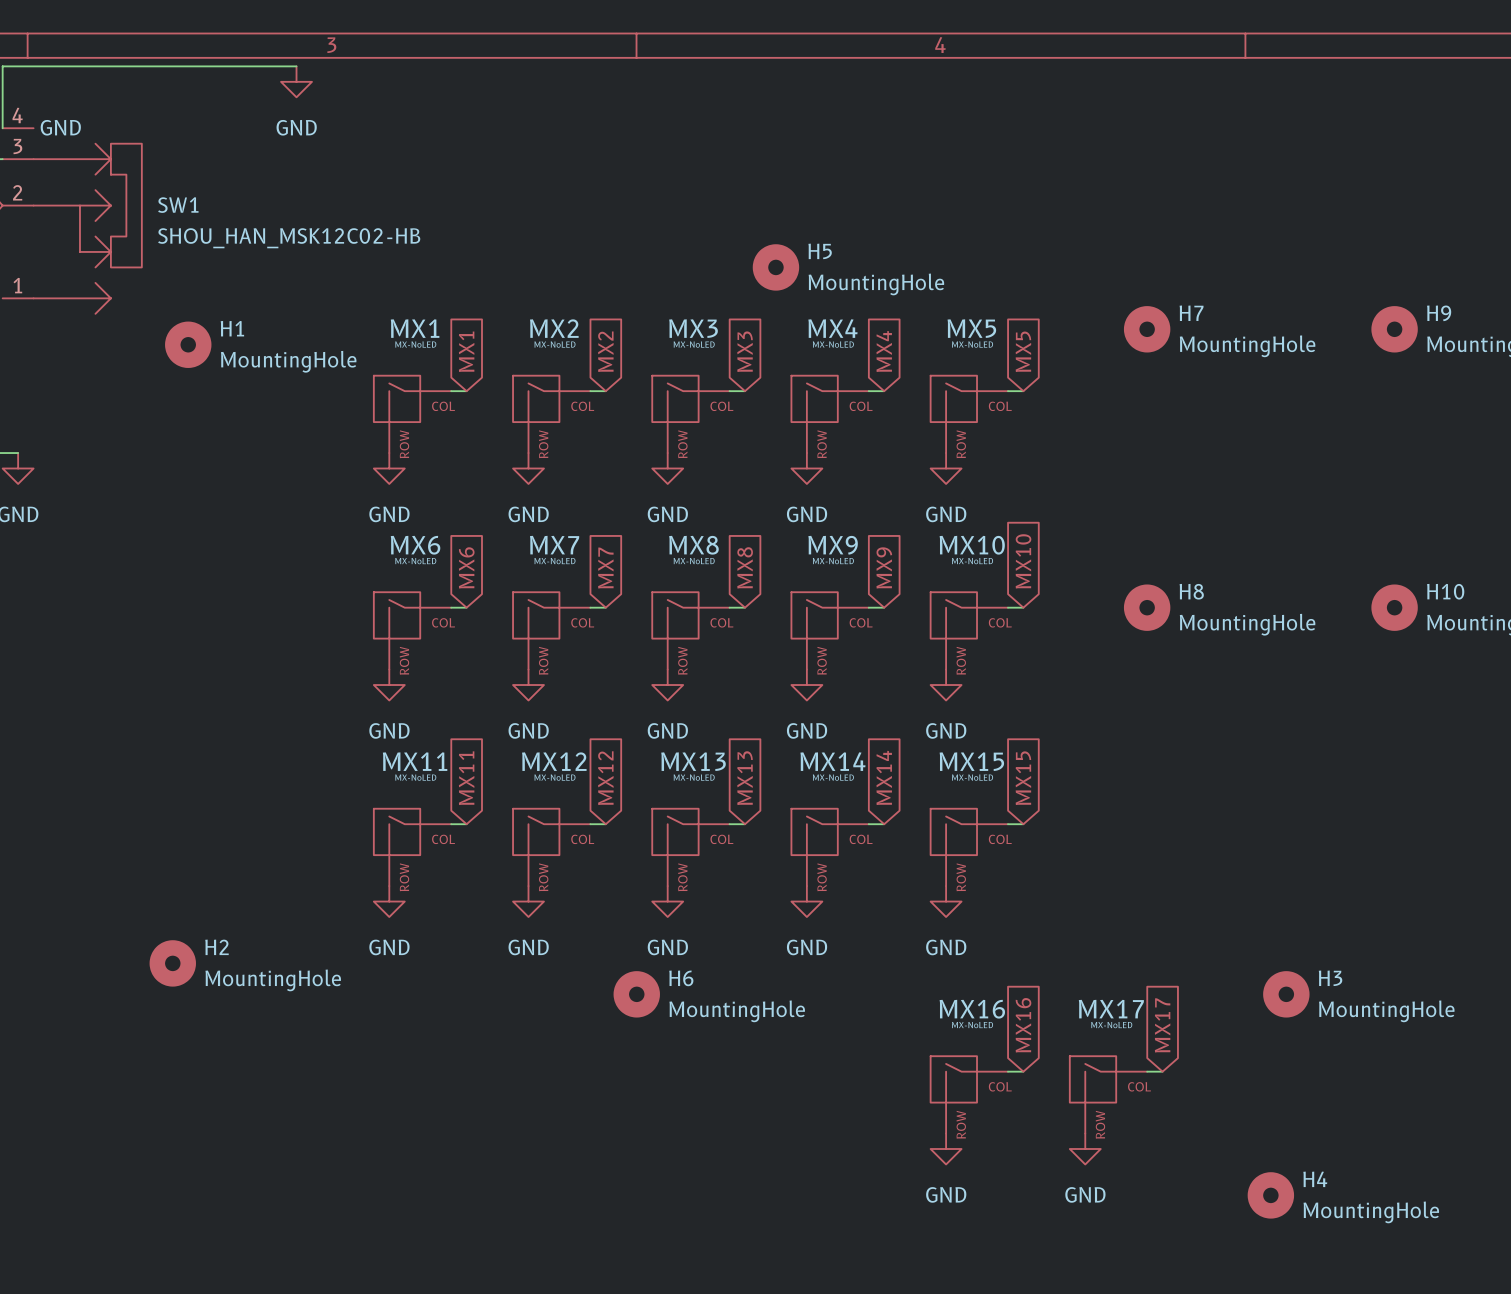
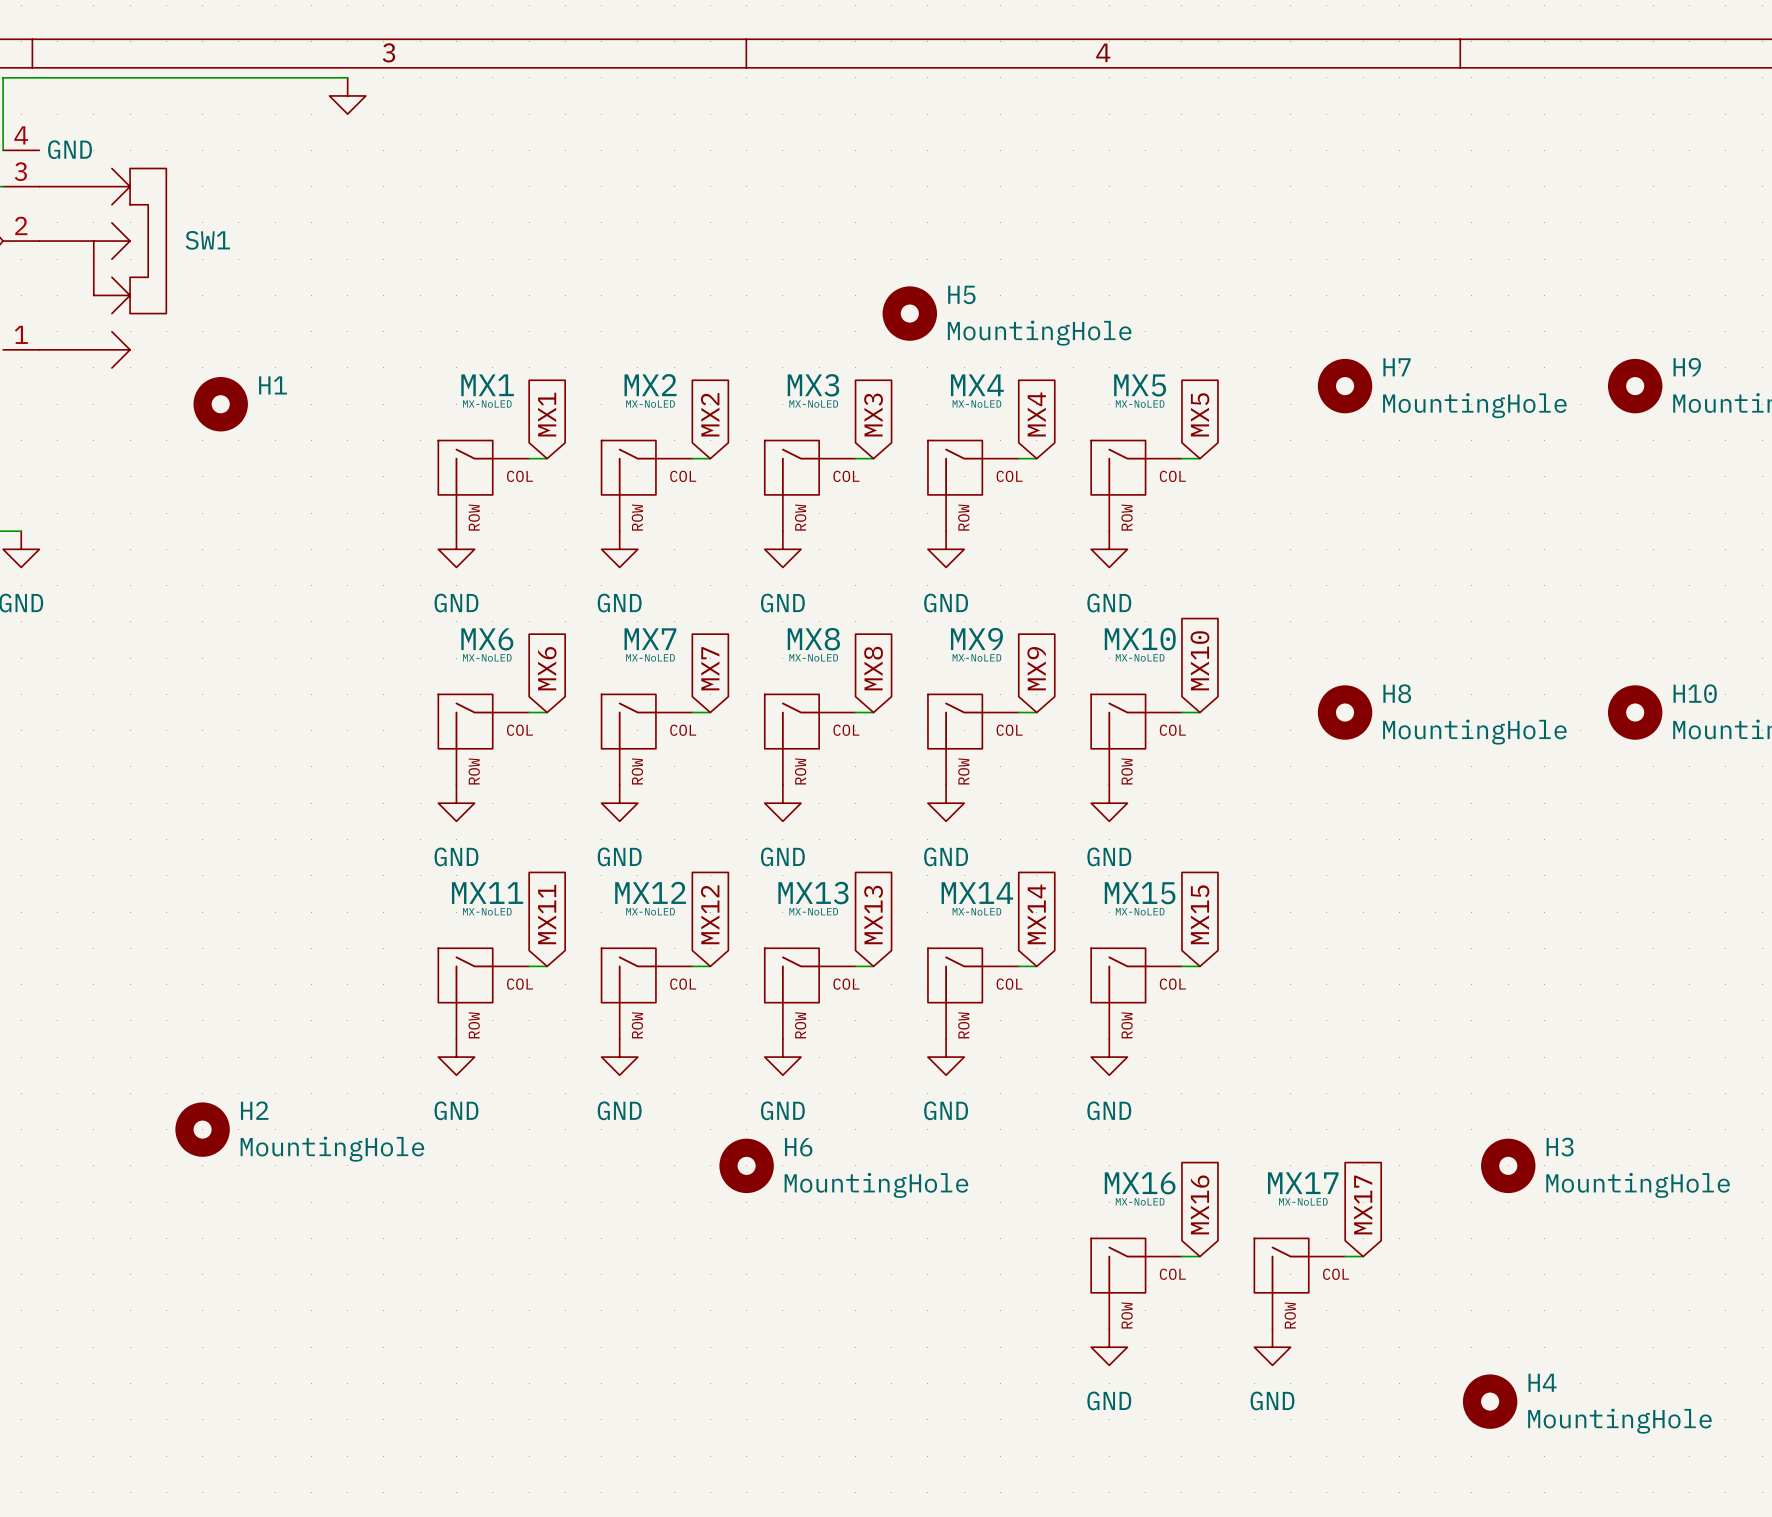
power symbol text: GND (296, 127) -> none
SW1 value: SHOU_HAN_MSK12C02-HB (289, 238) -> none
H1 value: MountingHole (288, 361) -> none

